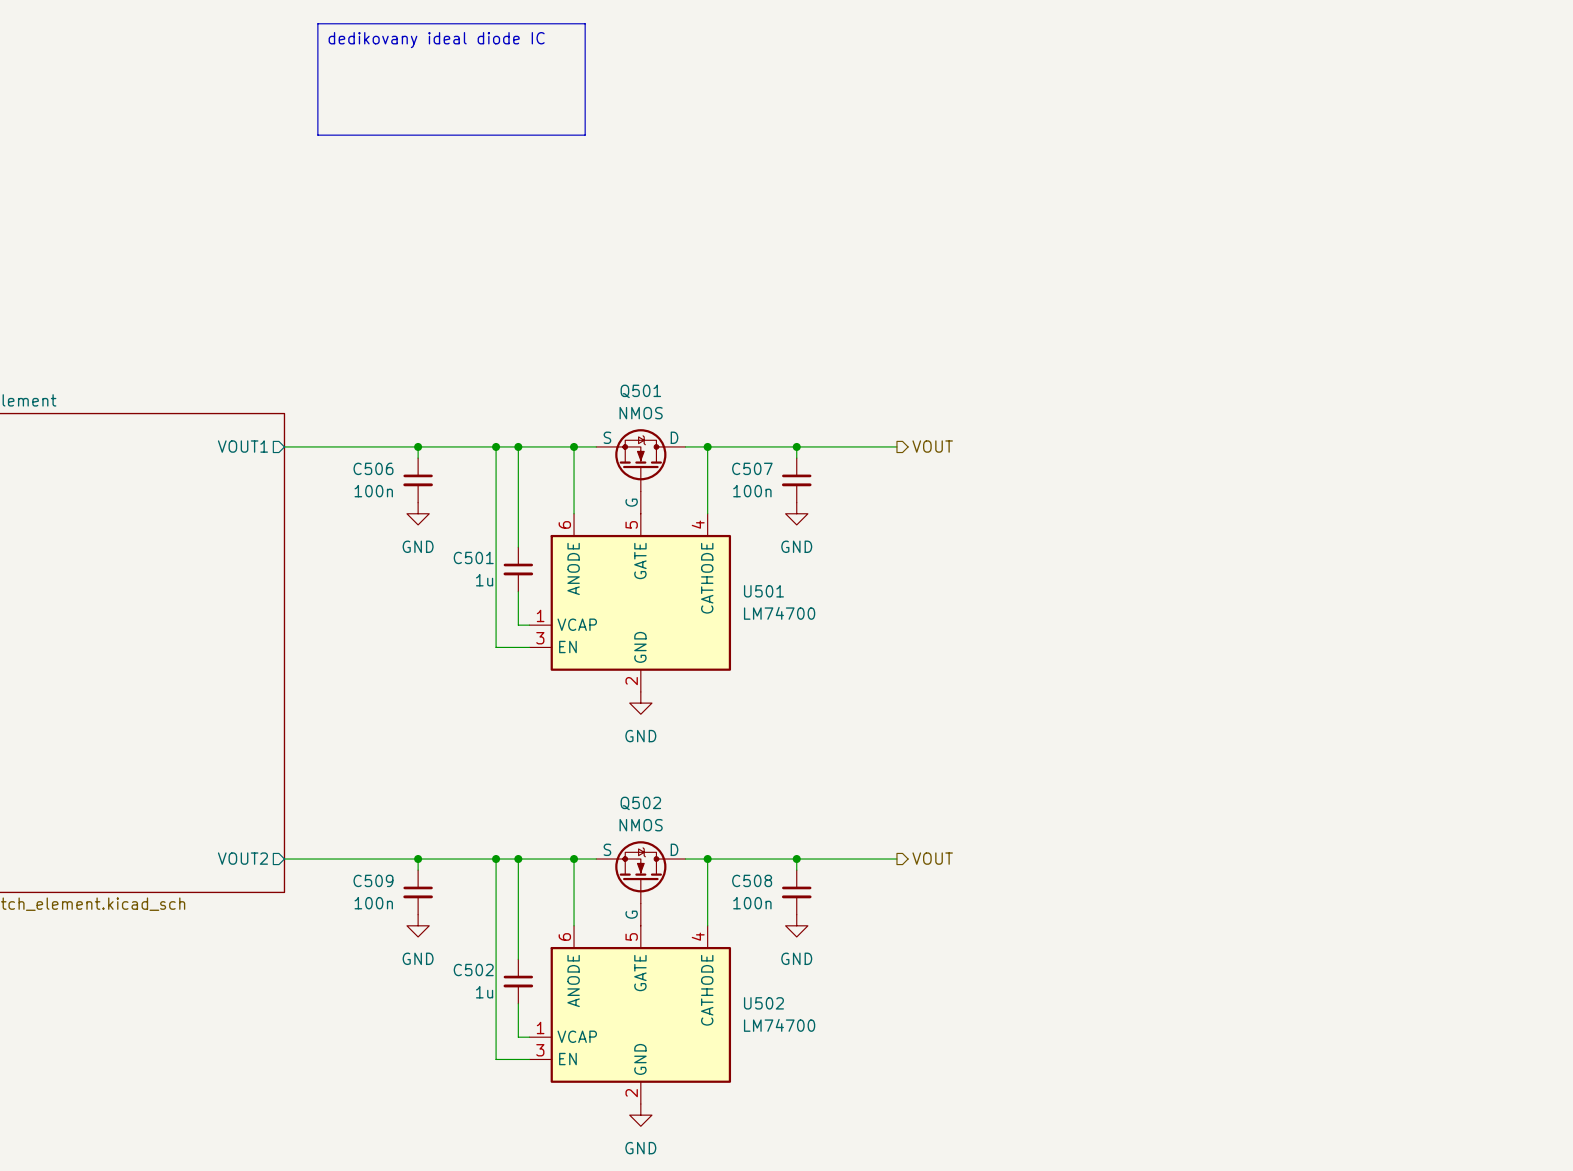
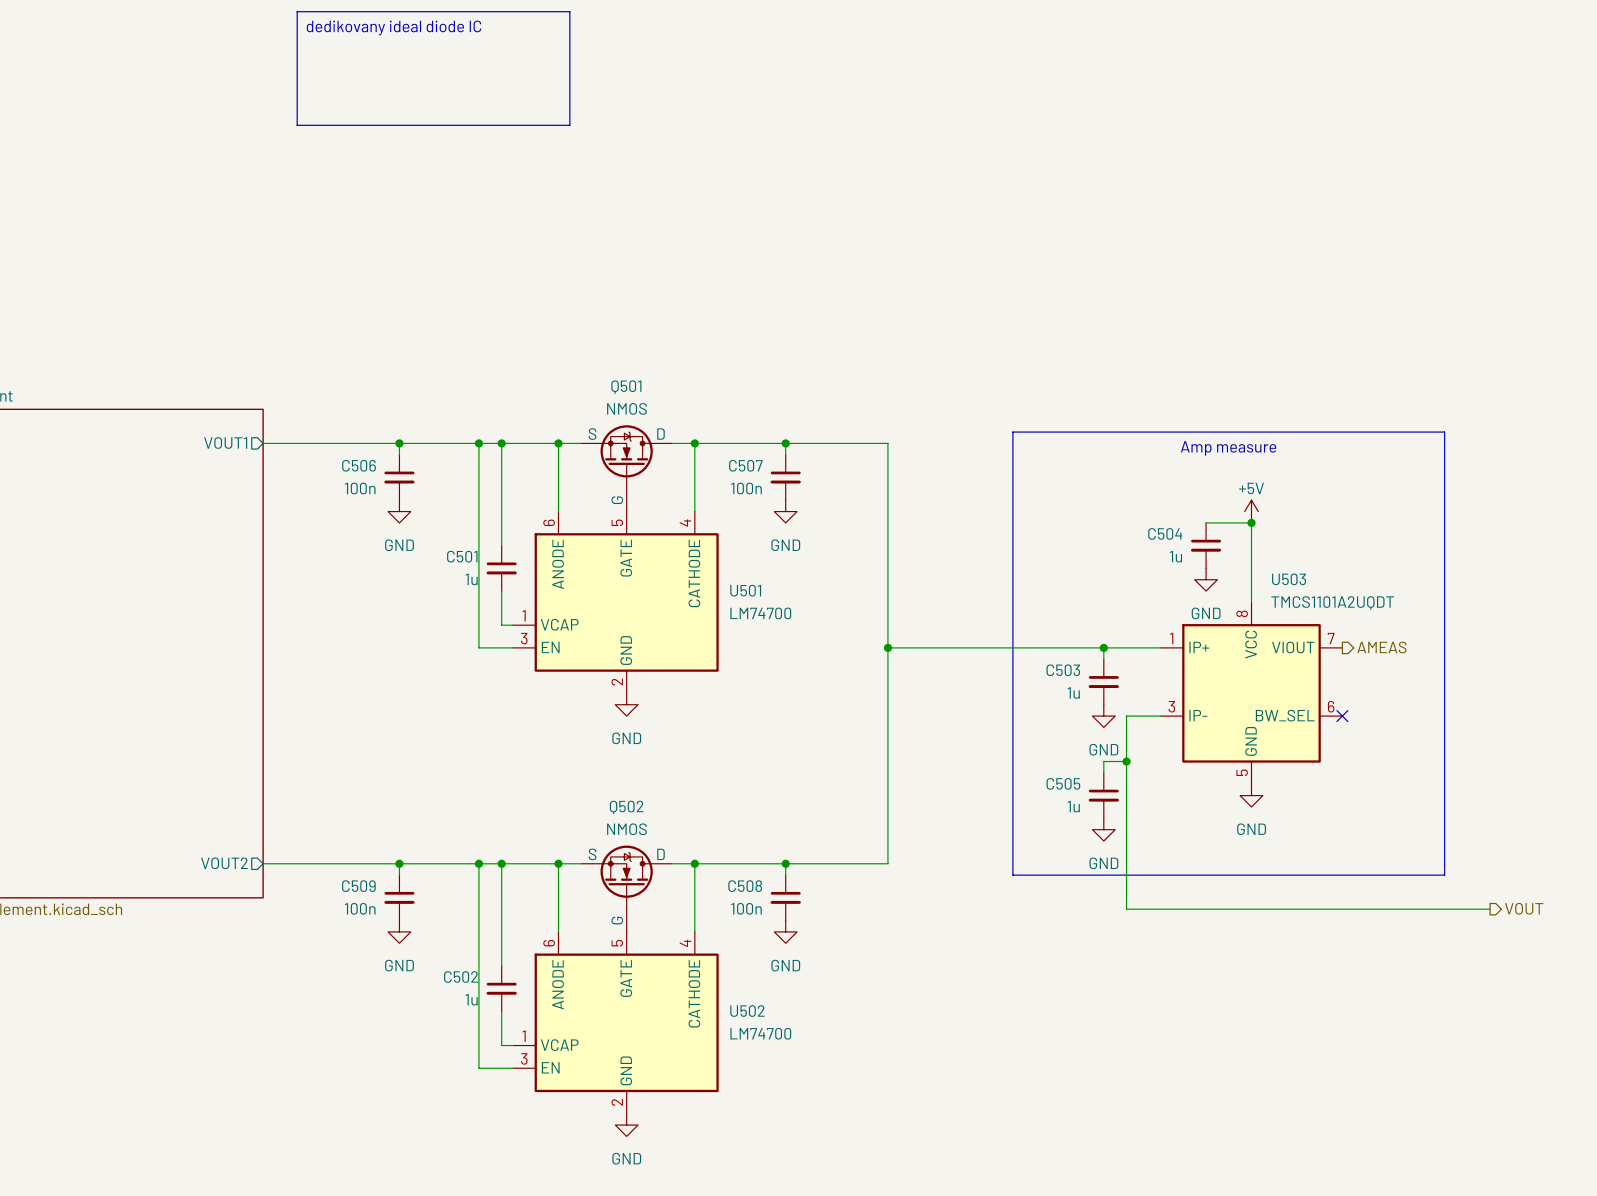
line: none -> (1012, 432) (1444, 432) (1444, 875) (1012, 875) (1012, 432)
wire: none -> (887, 443) (887, 863)
hierarchical label: VOUT (932, 446) -> none
text: none -> Amp measure (1228, 448)
power symbol: none -> +5V (1251, 511)
wire: none -> (1206, 522) (1251, 522) (1251, 602)
junction: none -> (1251, 522)
C504: none -> 1u (1206, 545)
power symbol: none -> GND (1206, 579)
wire: none -> (887, 647) (1160, 647)
junction: none -> (887, 647)
wire: none -> (1103, 647) (1103, 659)
junction: none -> (1103, 647)
hierarchical label: none -> AMEAS (1381, 647)
C503: none -> 1u (1103, 681)
U503: none -> TMCS1101A2UQDT (1251, 693)
power symbol: none -> GND (1103, 716)
wire: none -> (1160, 716) (1126, 716) (1126, 909) (1490, 909)
no-connect mark: none -> (1342, 716)
wire: none -> (1126, 761) (1103, 761) (1103, 772)
junction: none -> (1126, 761)
C505: none -> 1u (1103, 795)
power symbol: none -> GND (1251, 795)
power symbol: none -> GND (1103, 829)
hierarchical label: VOUT (932, 858) -> none
hierarchical label: none -> VOUT (1524, 908)

